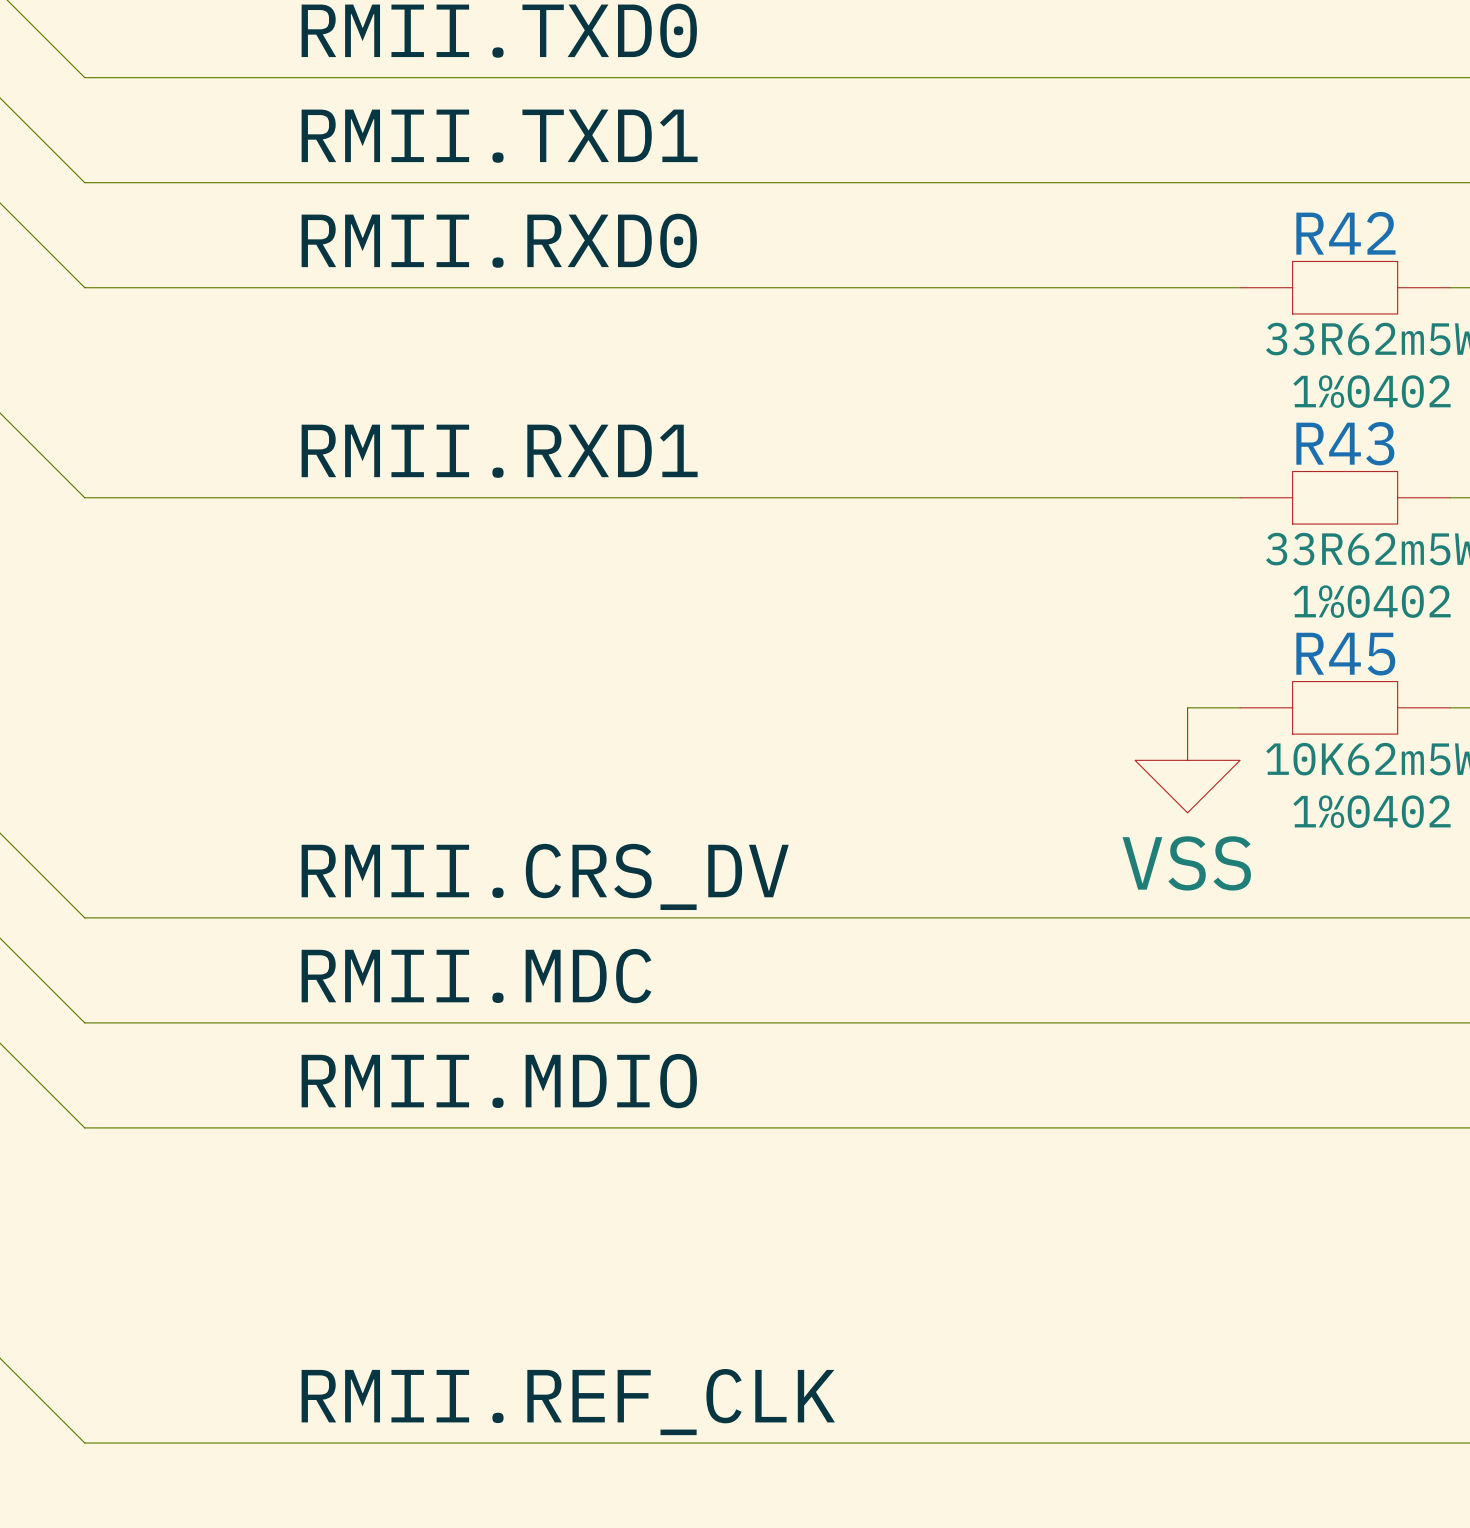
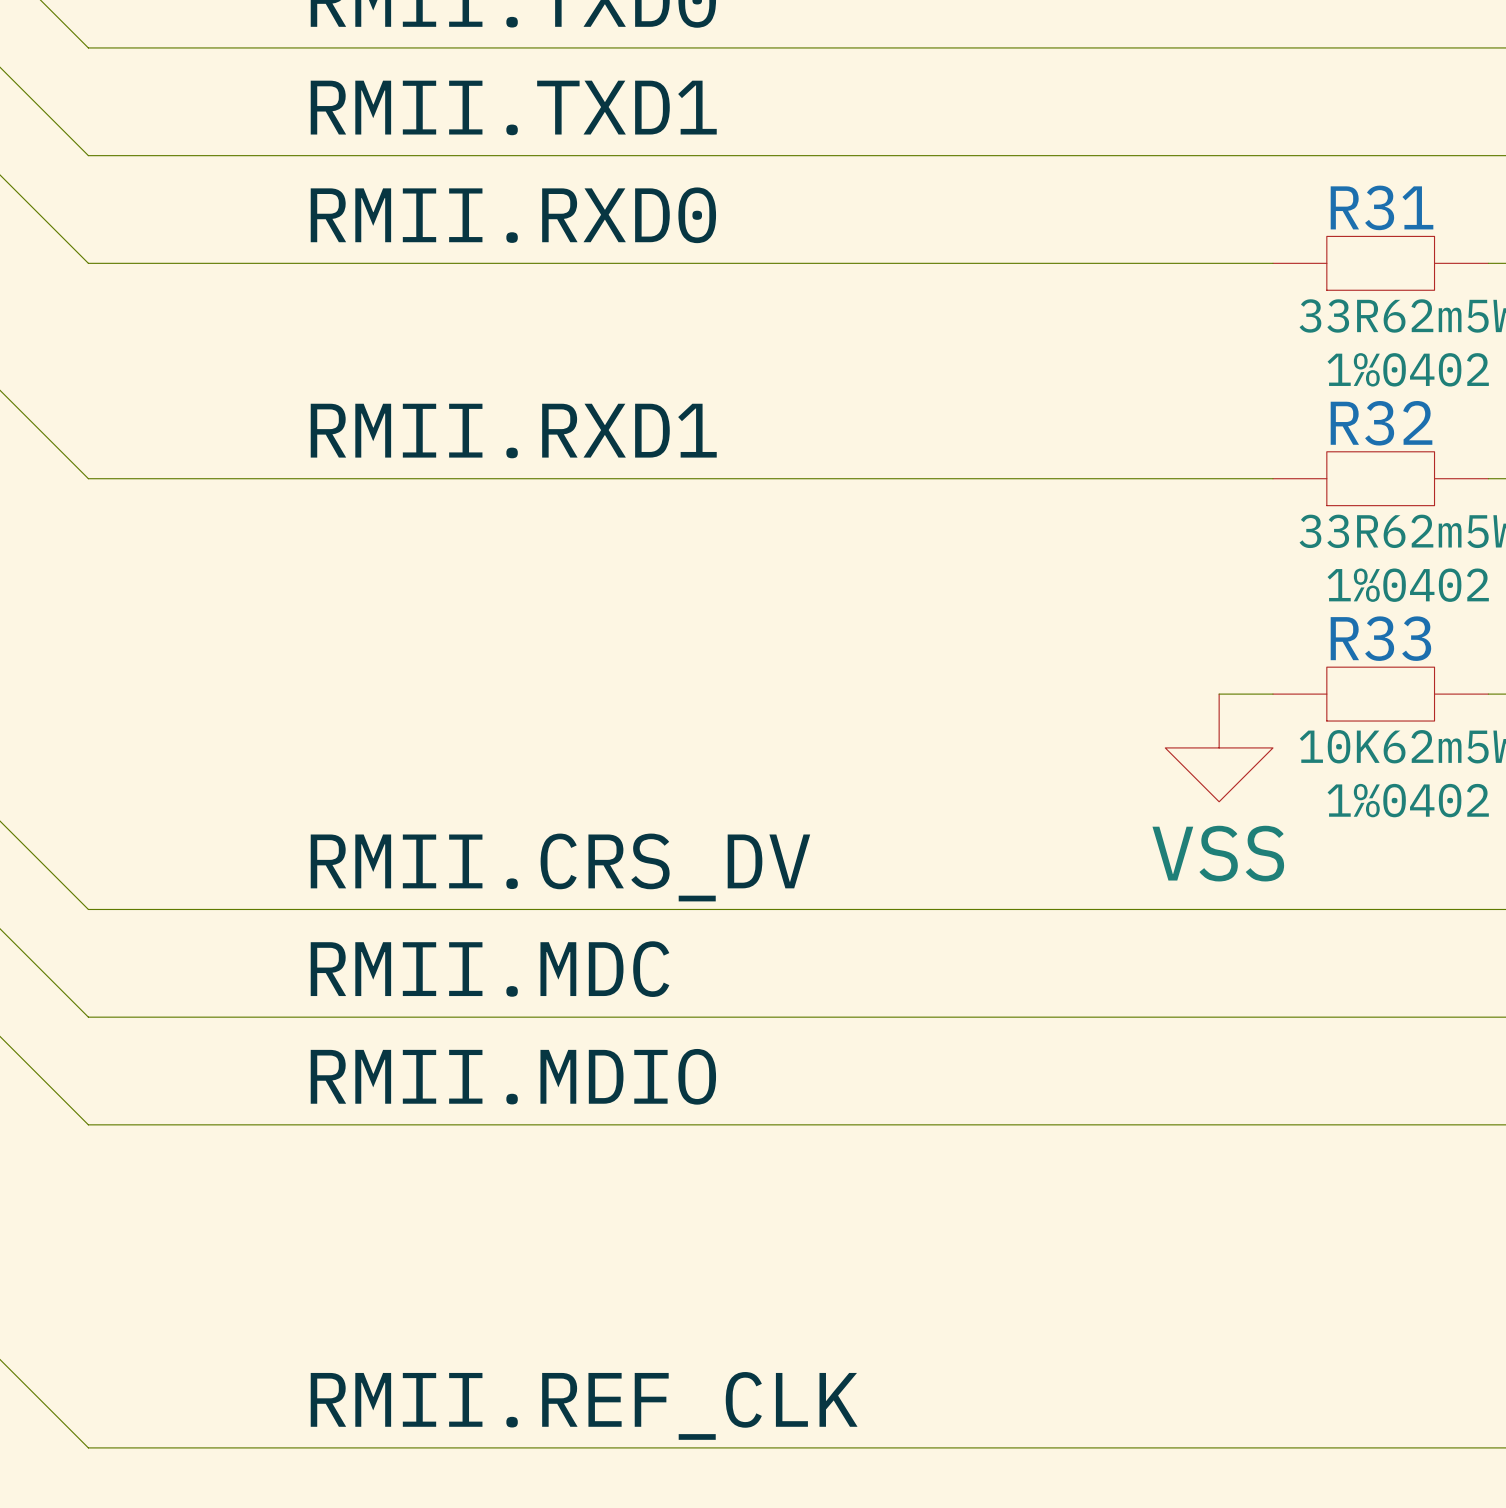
R42 name: R42 (1345, 233) -> R31 (1382, 207)
R43 name: R43 (1345, 443) -> R32 (1381, 423)
R45 name: R45 (1345, 654) -> R33 (1380, 638)

